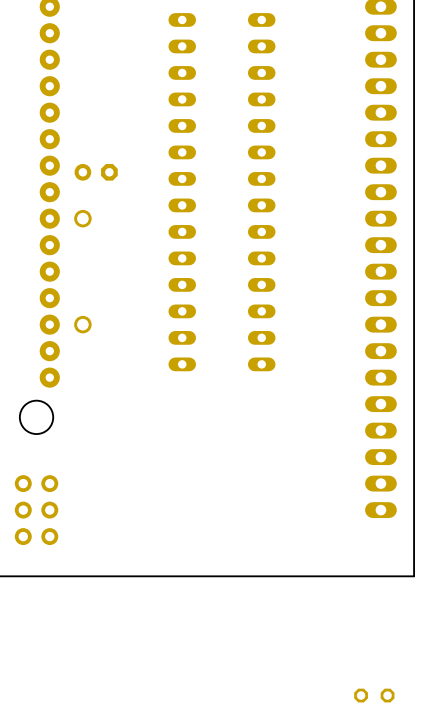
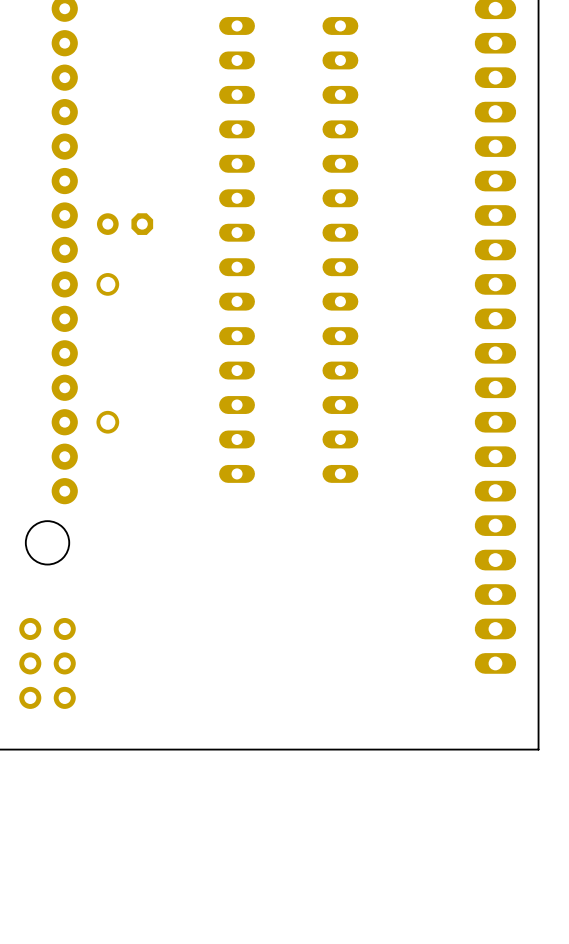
part: (374, 695) -> none

